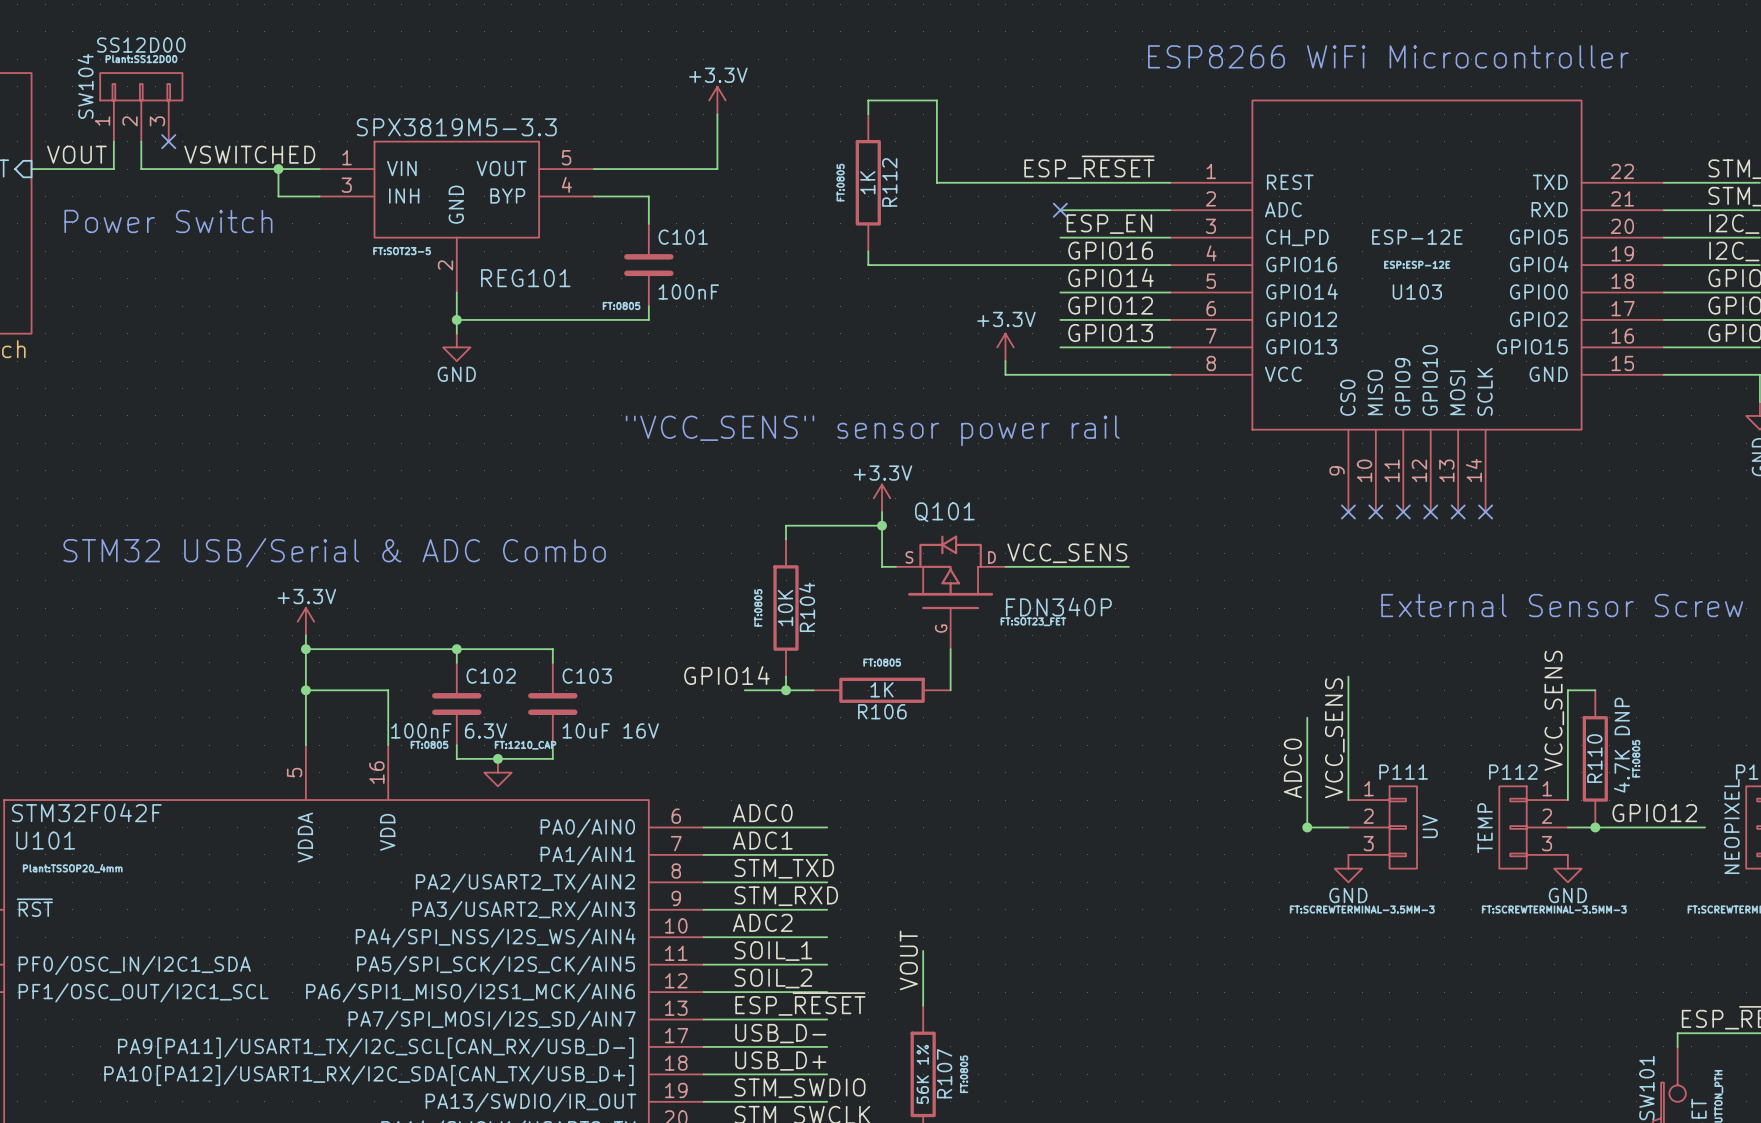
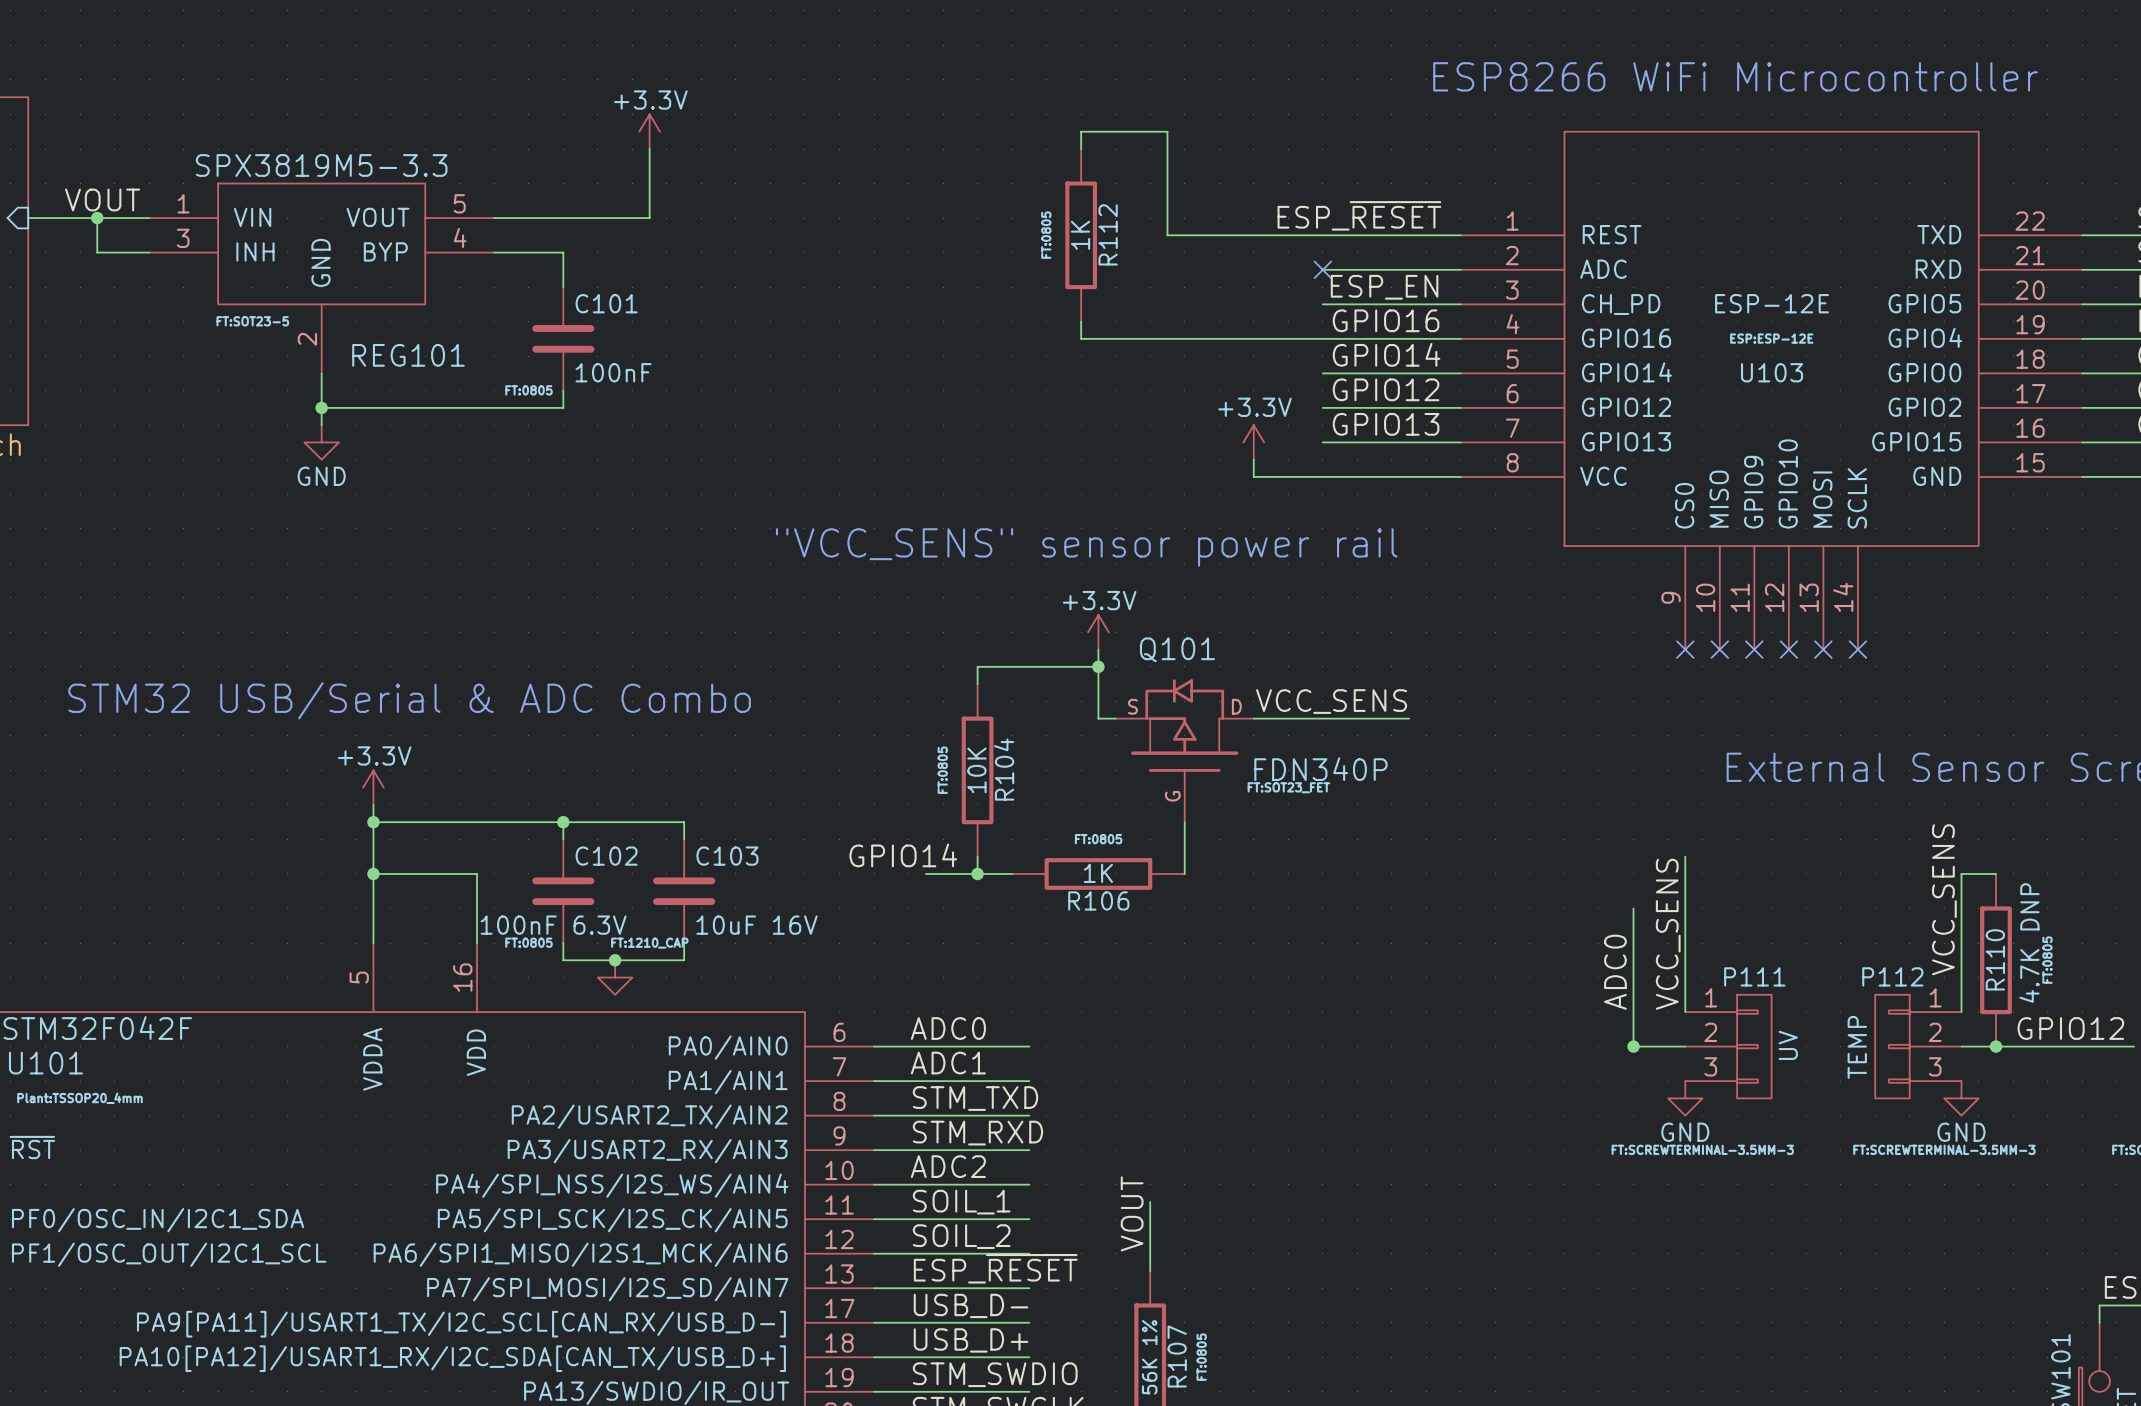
power symbol position: +3.3V (717, 100) -> +3.3V (649, 131)
SW104: SS12D00 (141, 107) -> none
wire: (717, 114) (717, 169) (593, 169) -> (649, 149) (649, 218) (494, 218)
wire: (113, 141) (113, 169) -> (149, 218) (131, 218)
wire: (141, 141) (141, 169) (319, 169) -> none
no-connect mark: (168, 141) -> none
label position: VOUT (76, 154) -> VOUT (102, 199)
label: VSWITCHED (249, 154) -> none
junction: none -> (97, 218)
wire: (278, 169) (278, 196) (319, 196) -> (97, 218) (97, 252) (149, 252)
junction: (278, 169) -> none
wire: (593, 196) (648, 196) (648, 223) -> (494, 252) (563, 252) (563, 287)
REG101 position: (456, 217) -> (321, 278)
text: Power Switch (168, 221) -> none
C101 position: (648, 265) -> (563, 338)
wire: none -> (321, 373) (321, 425)
wire: (648, 306) (648, 319) (456, 319) (456, 333) -> none
wire: none -> (321, 407) (563, 407)
junction: none -> (321, 407)
junction: (456, 319) -> none
power symbol position: GND (456, 347) -> GND (321, 442)

